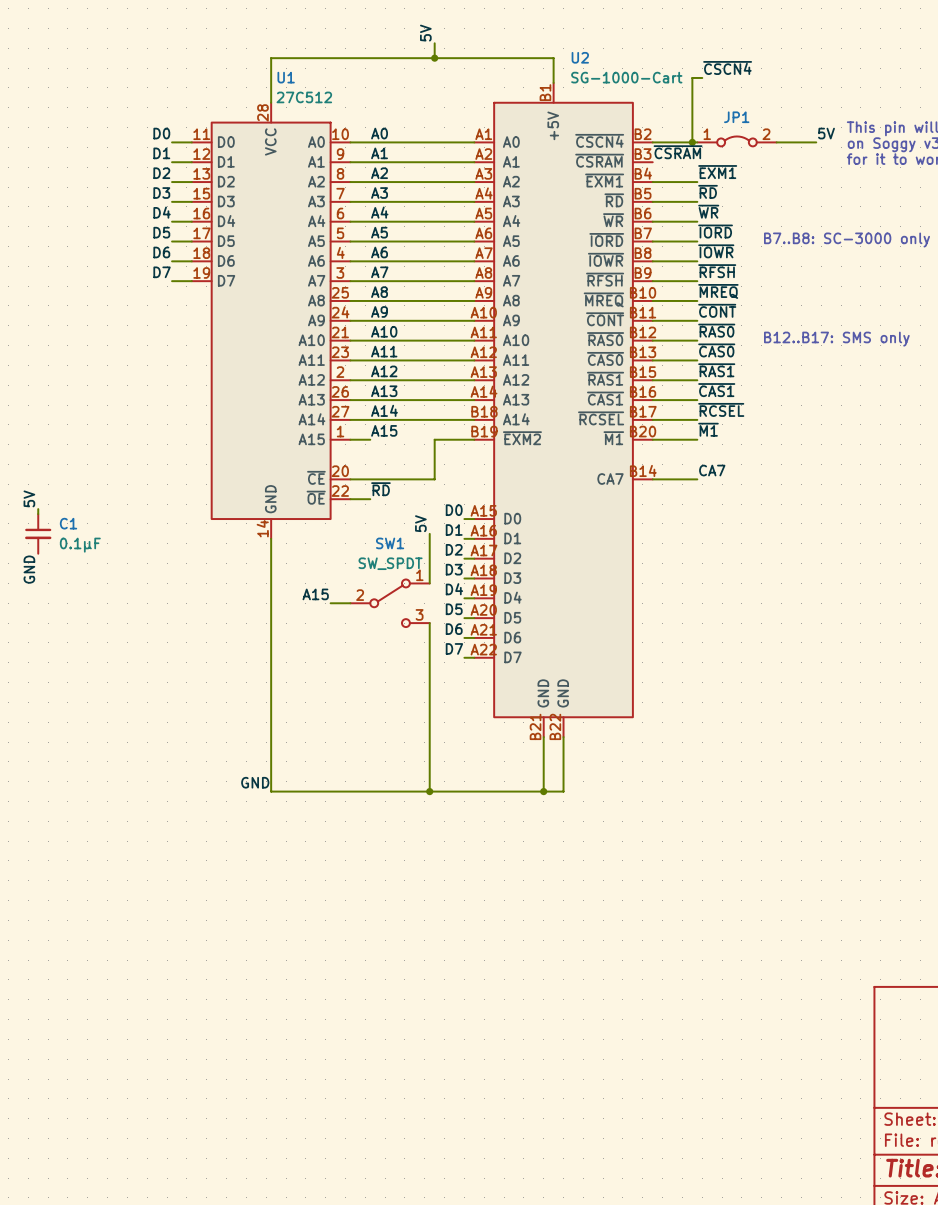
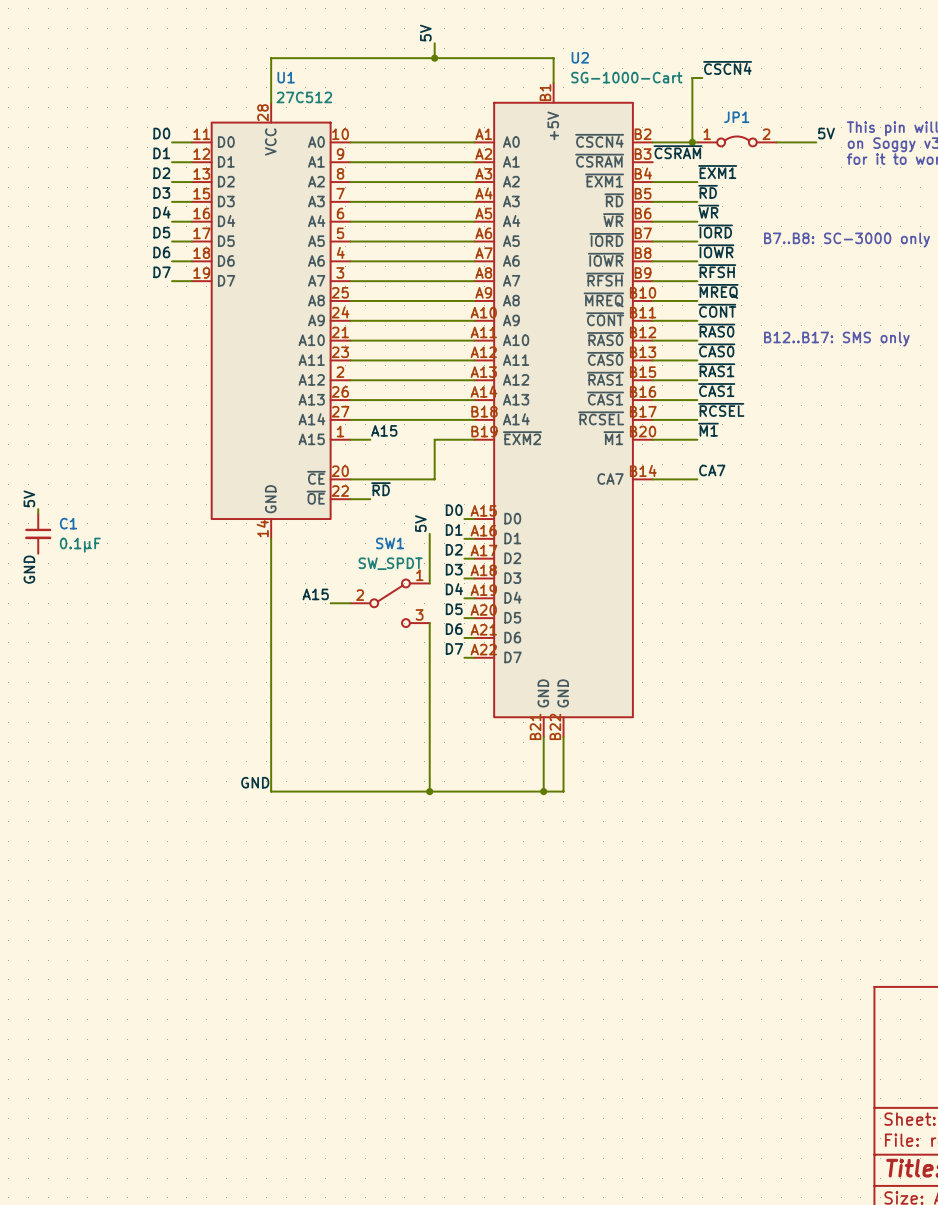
label: A0 (379, 133) -> none
label: A1 (379, 153) -> none
label: A2 (379, 173) -> none
label: A3 (379, 193) -> none
label: A4 (379, 212) -> none
label: A5 (379, 232) -> none
label: A6 (379, 252) -> none
label: A7 (379, 272) -> none
label: A8 (379, 292) -> none
label: A9 (379, 311) -> none
label: A10 (384, 331) -> none
label: A11 (384, 351) -> none
label: A12 (384, 371) -> none
label: A13 (384, 391) -> none
label: A14 (384, 410) -> none

